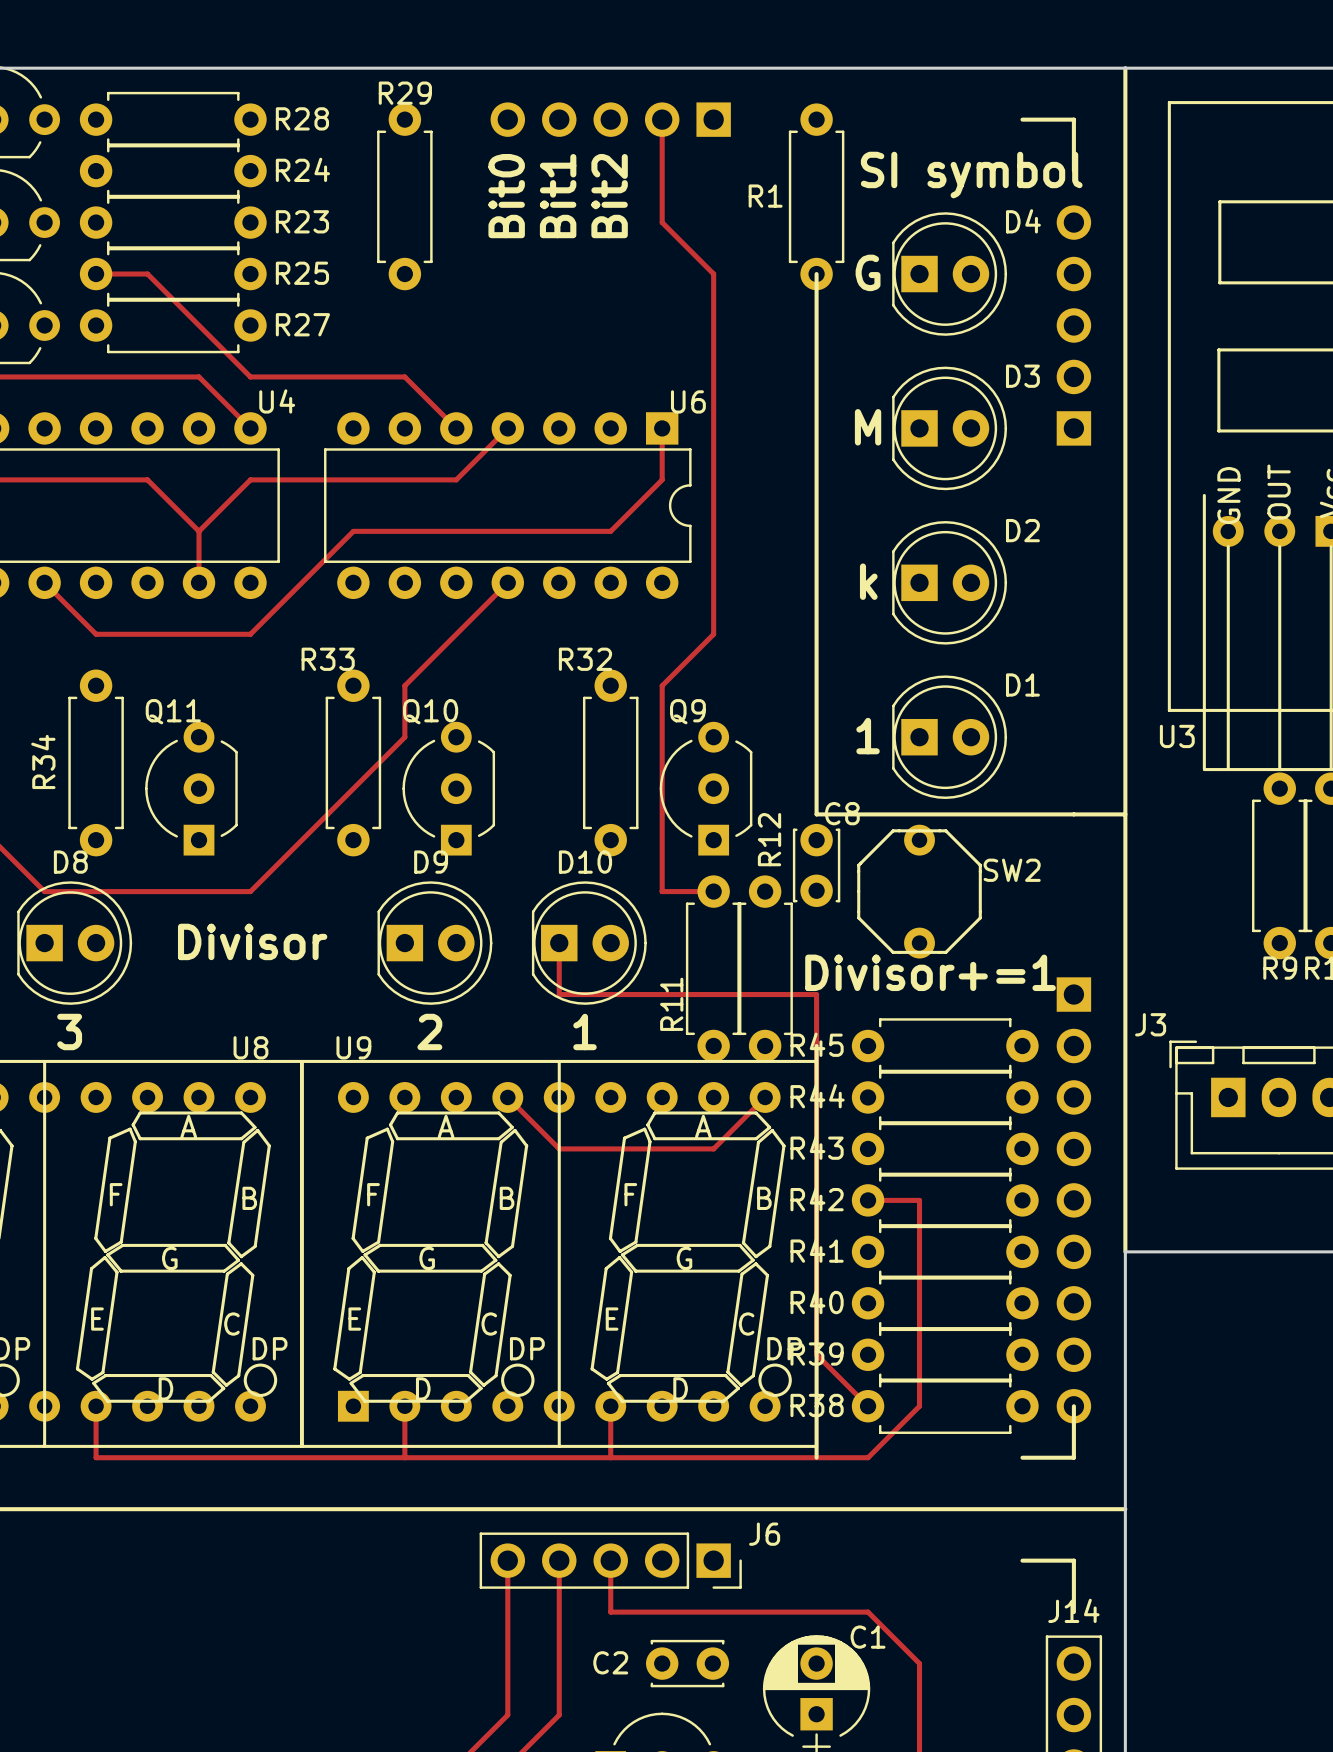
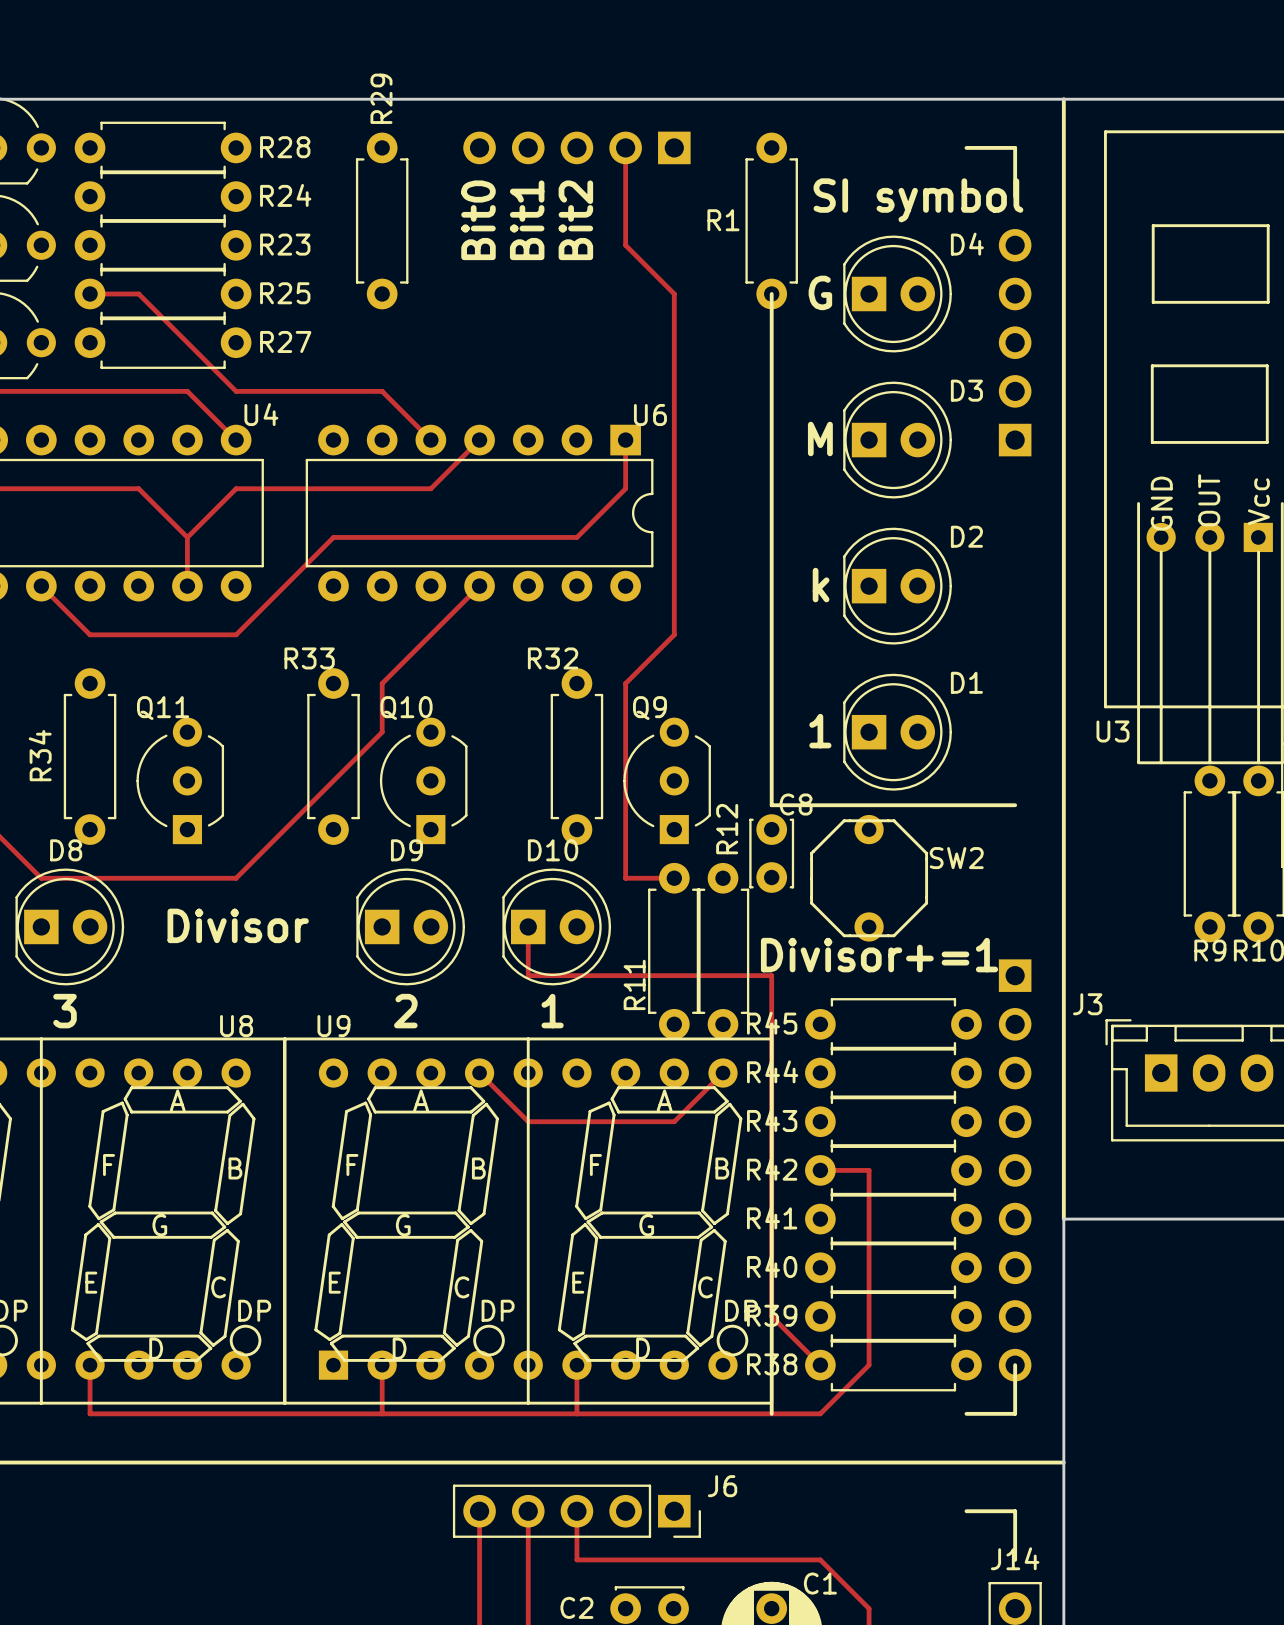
R29 name rotation: 0° (405, 93) -> 90° counterclockwise (381, 98)
line: (1073, 814) (1125, 814) -> none

